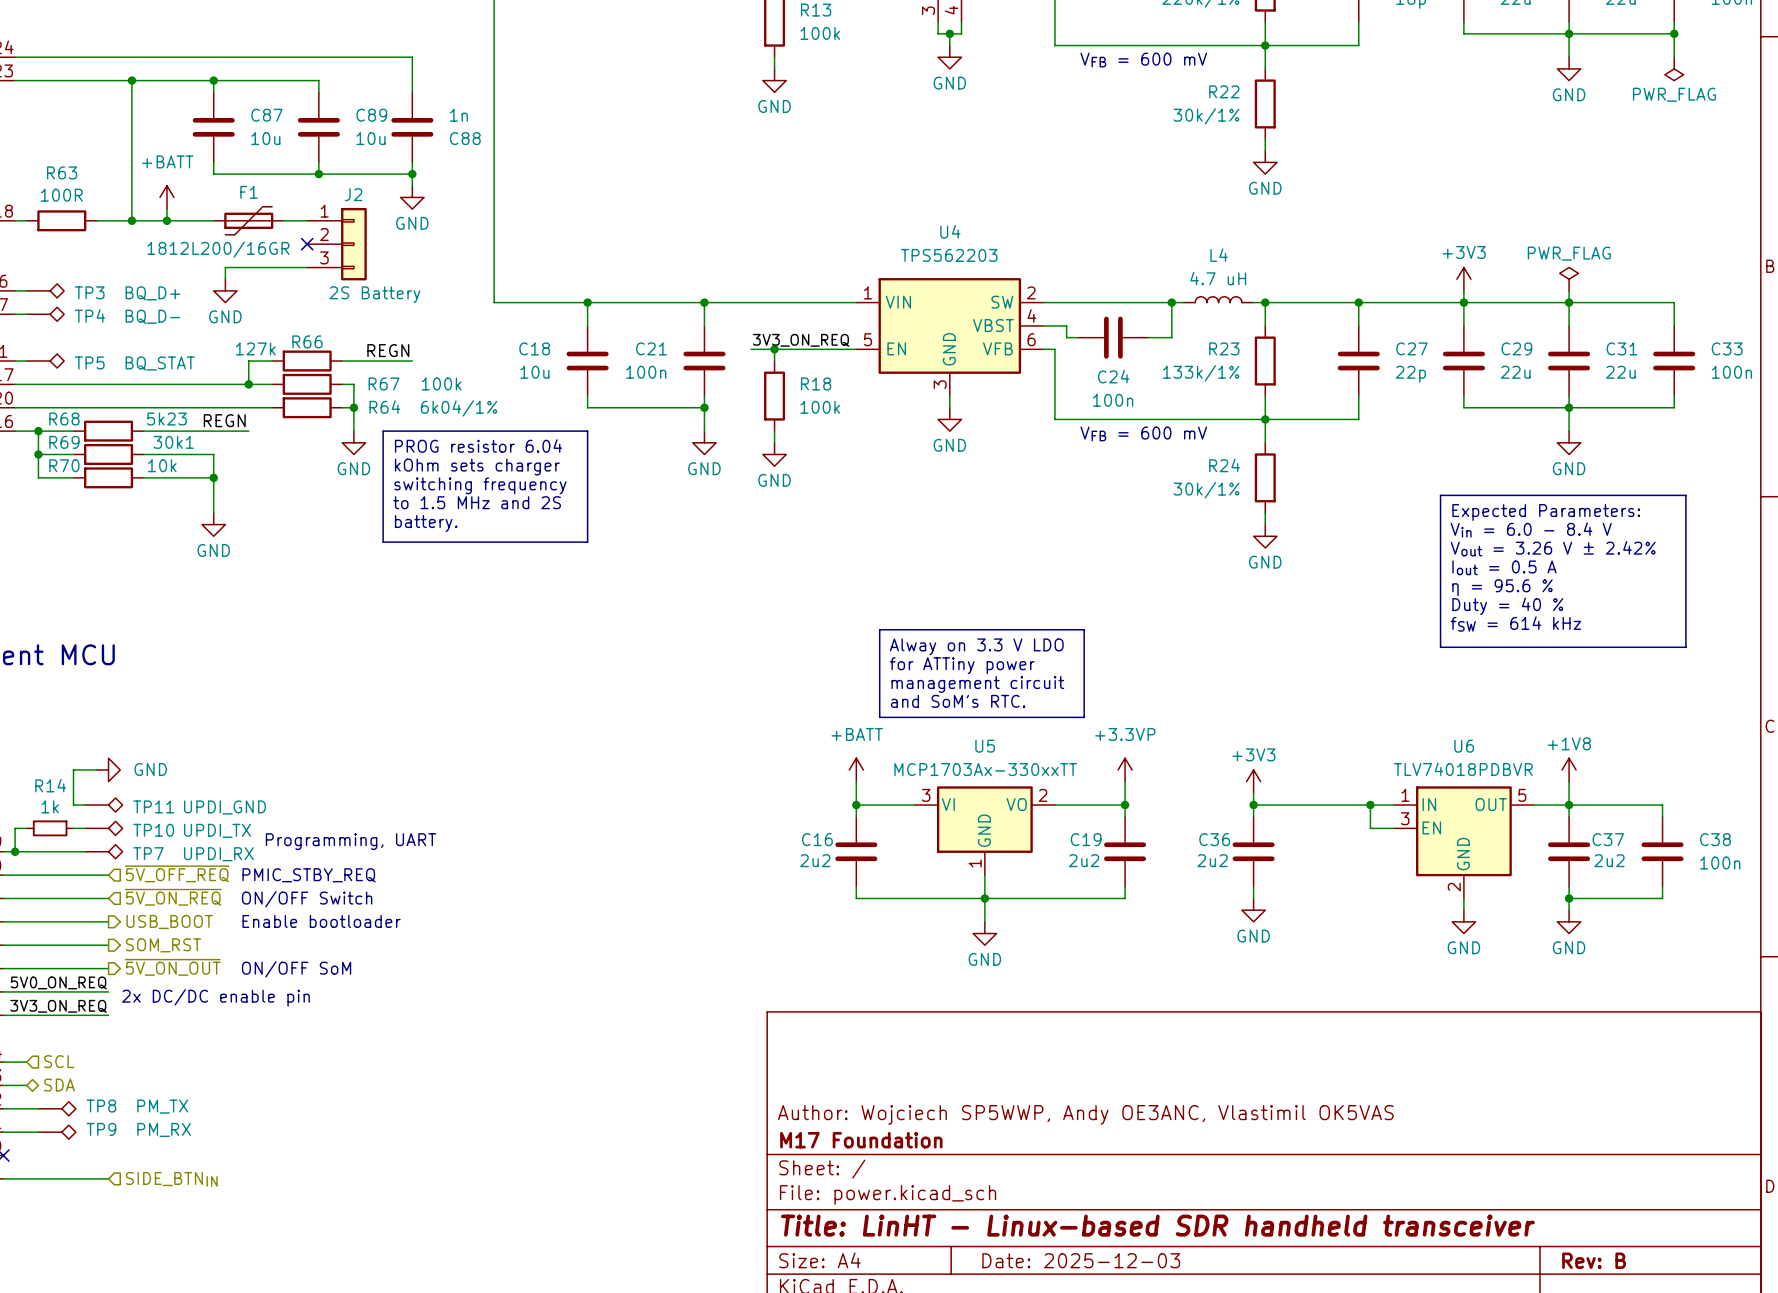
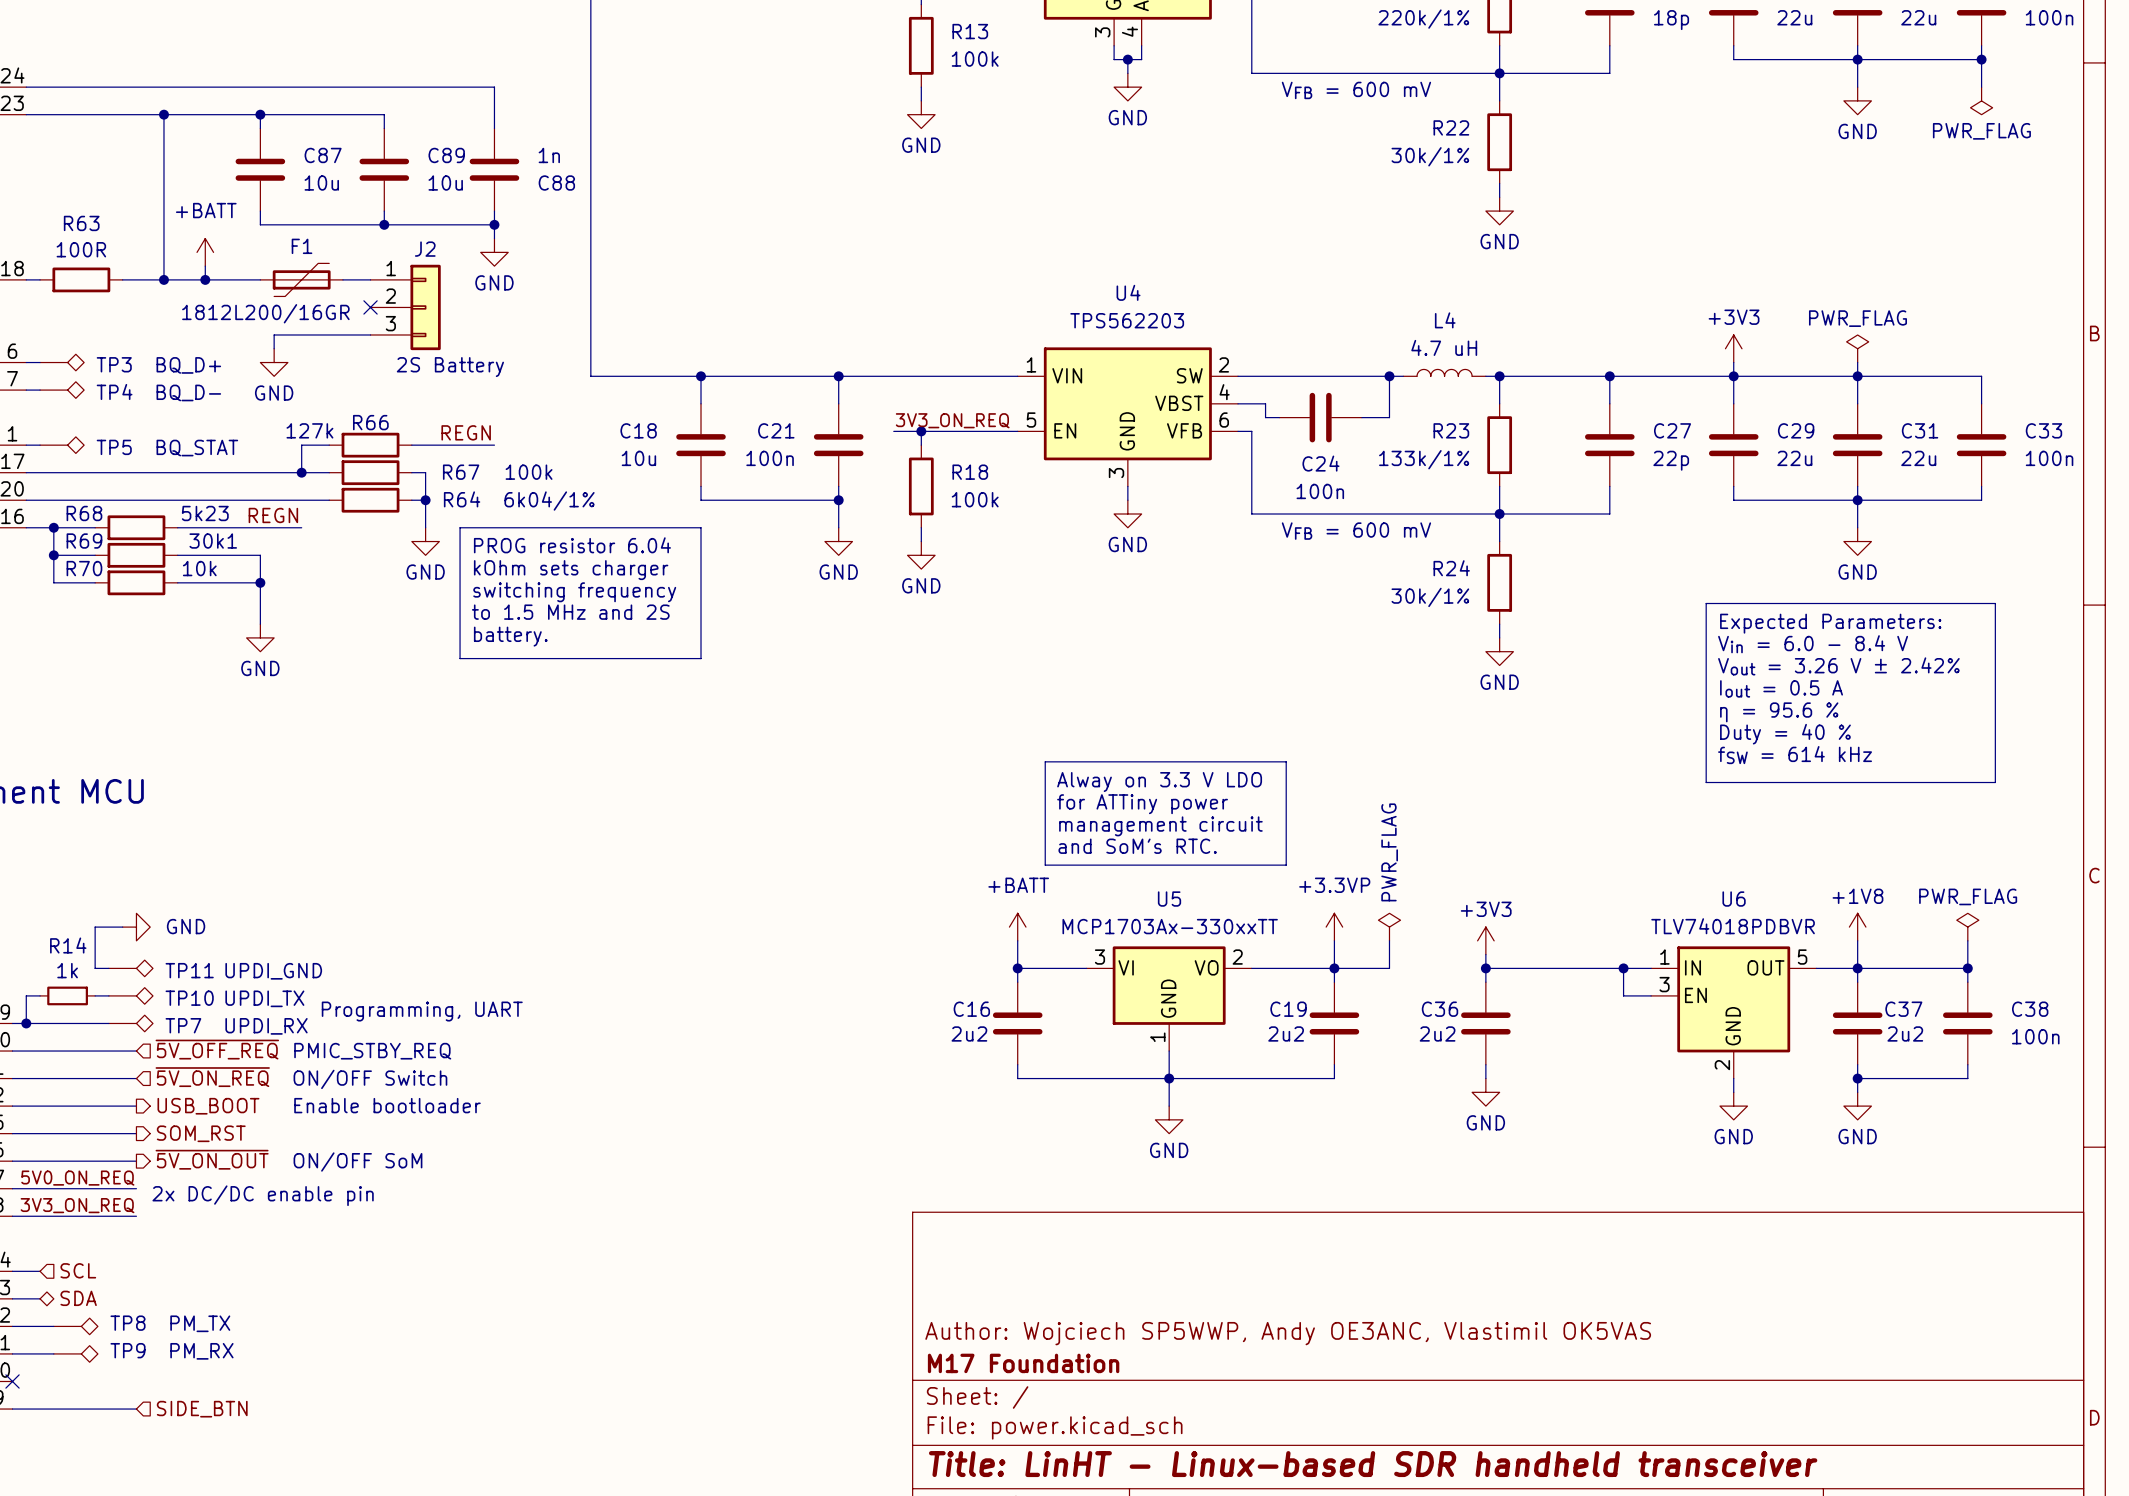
power symbol: none -> PWR_FLAG (1389, 927)
power symbol: none -> PWR_FLAG (1967, 927)
wire: none -> (1389, 940) (1389, 968) (1334, 968)
wire: none -> (1967, 940) (1967, 968)
junction: none -> (1967, 968)
hierarchical label: SIDE_BTNIN (171, 1179) -> SIDE_BTN (202, 1409)

